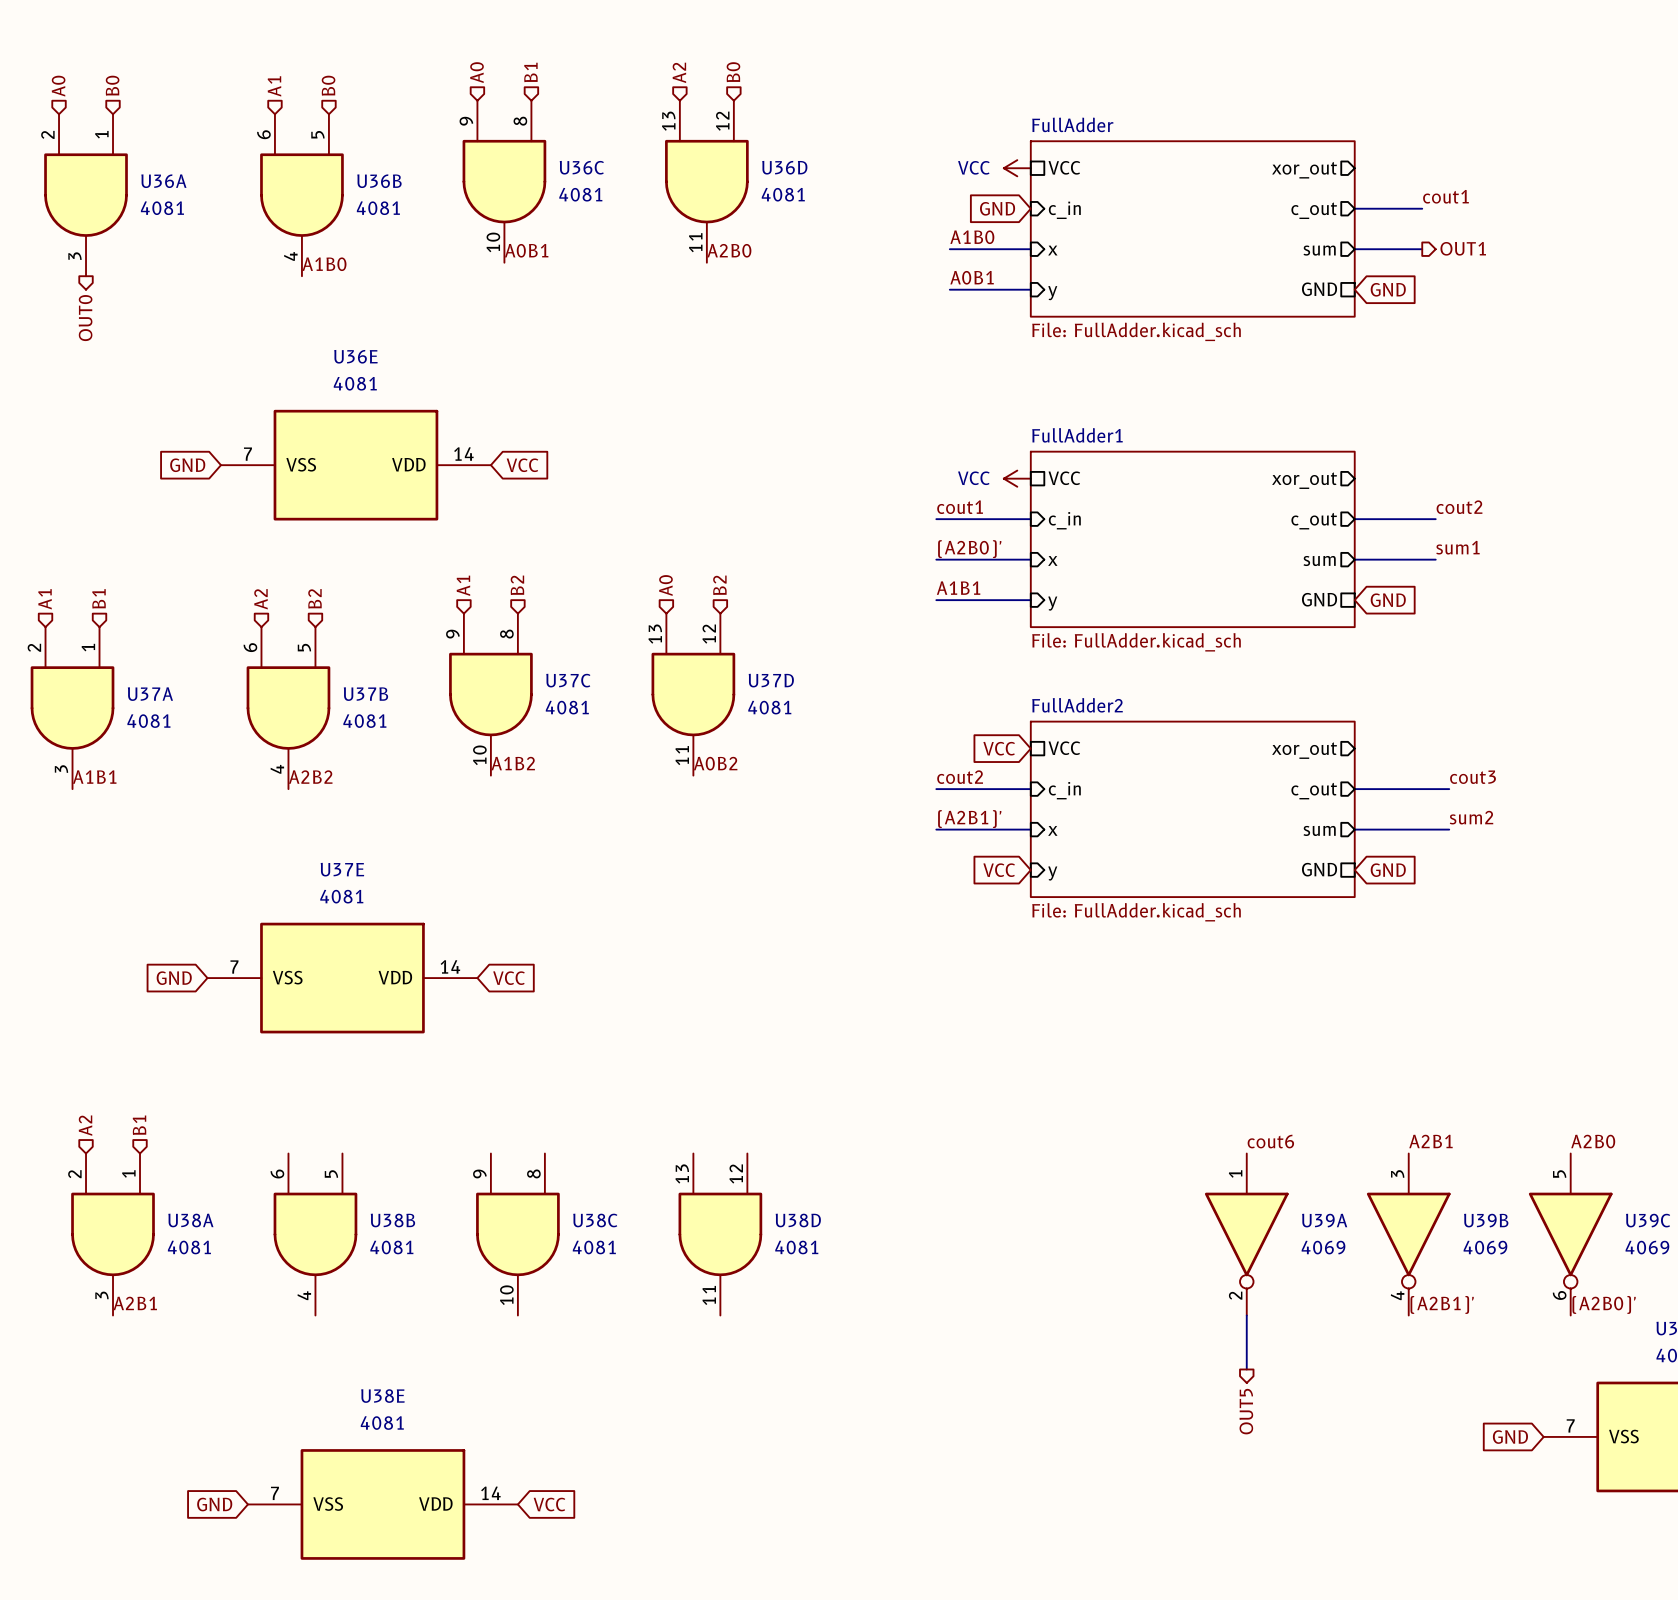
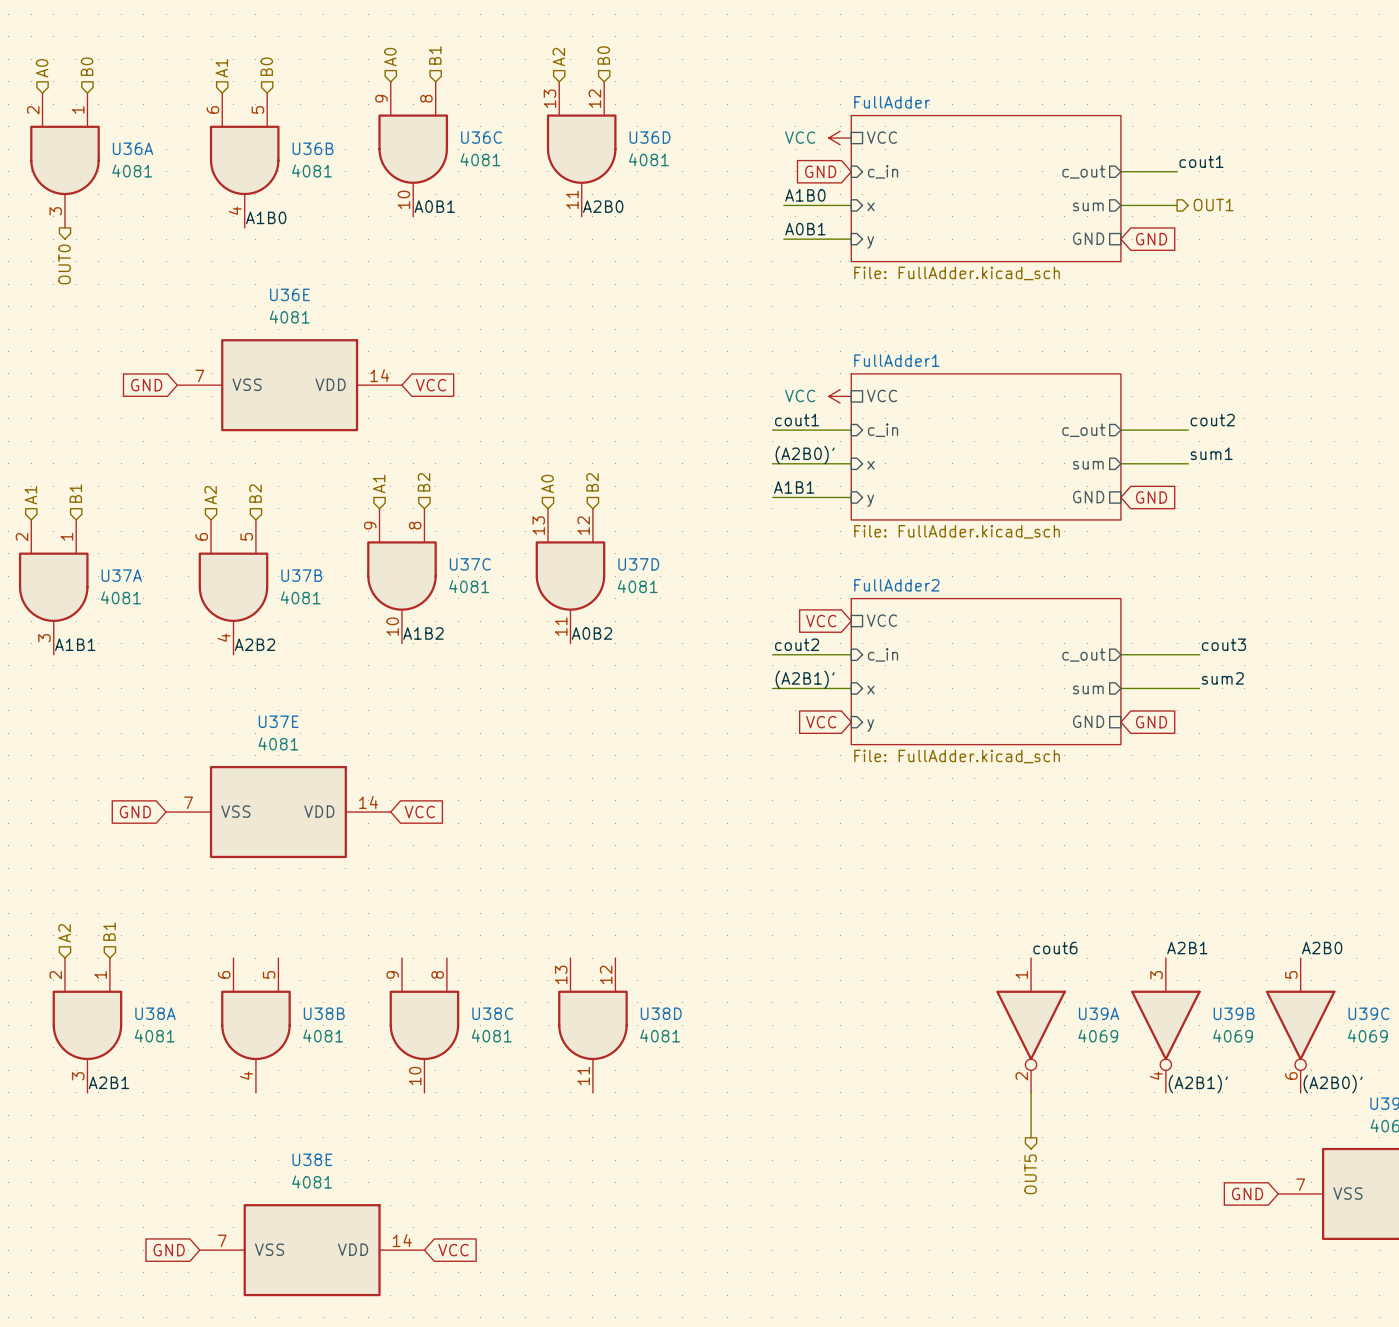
sheet pin: xor_out (1304, 170) -> none
sheet pin: xor_out (1304, 480) -> none
sheet pin: xor_out (1304, 750) -> none

